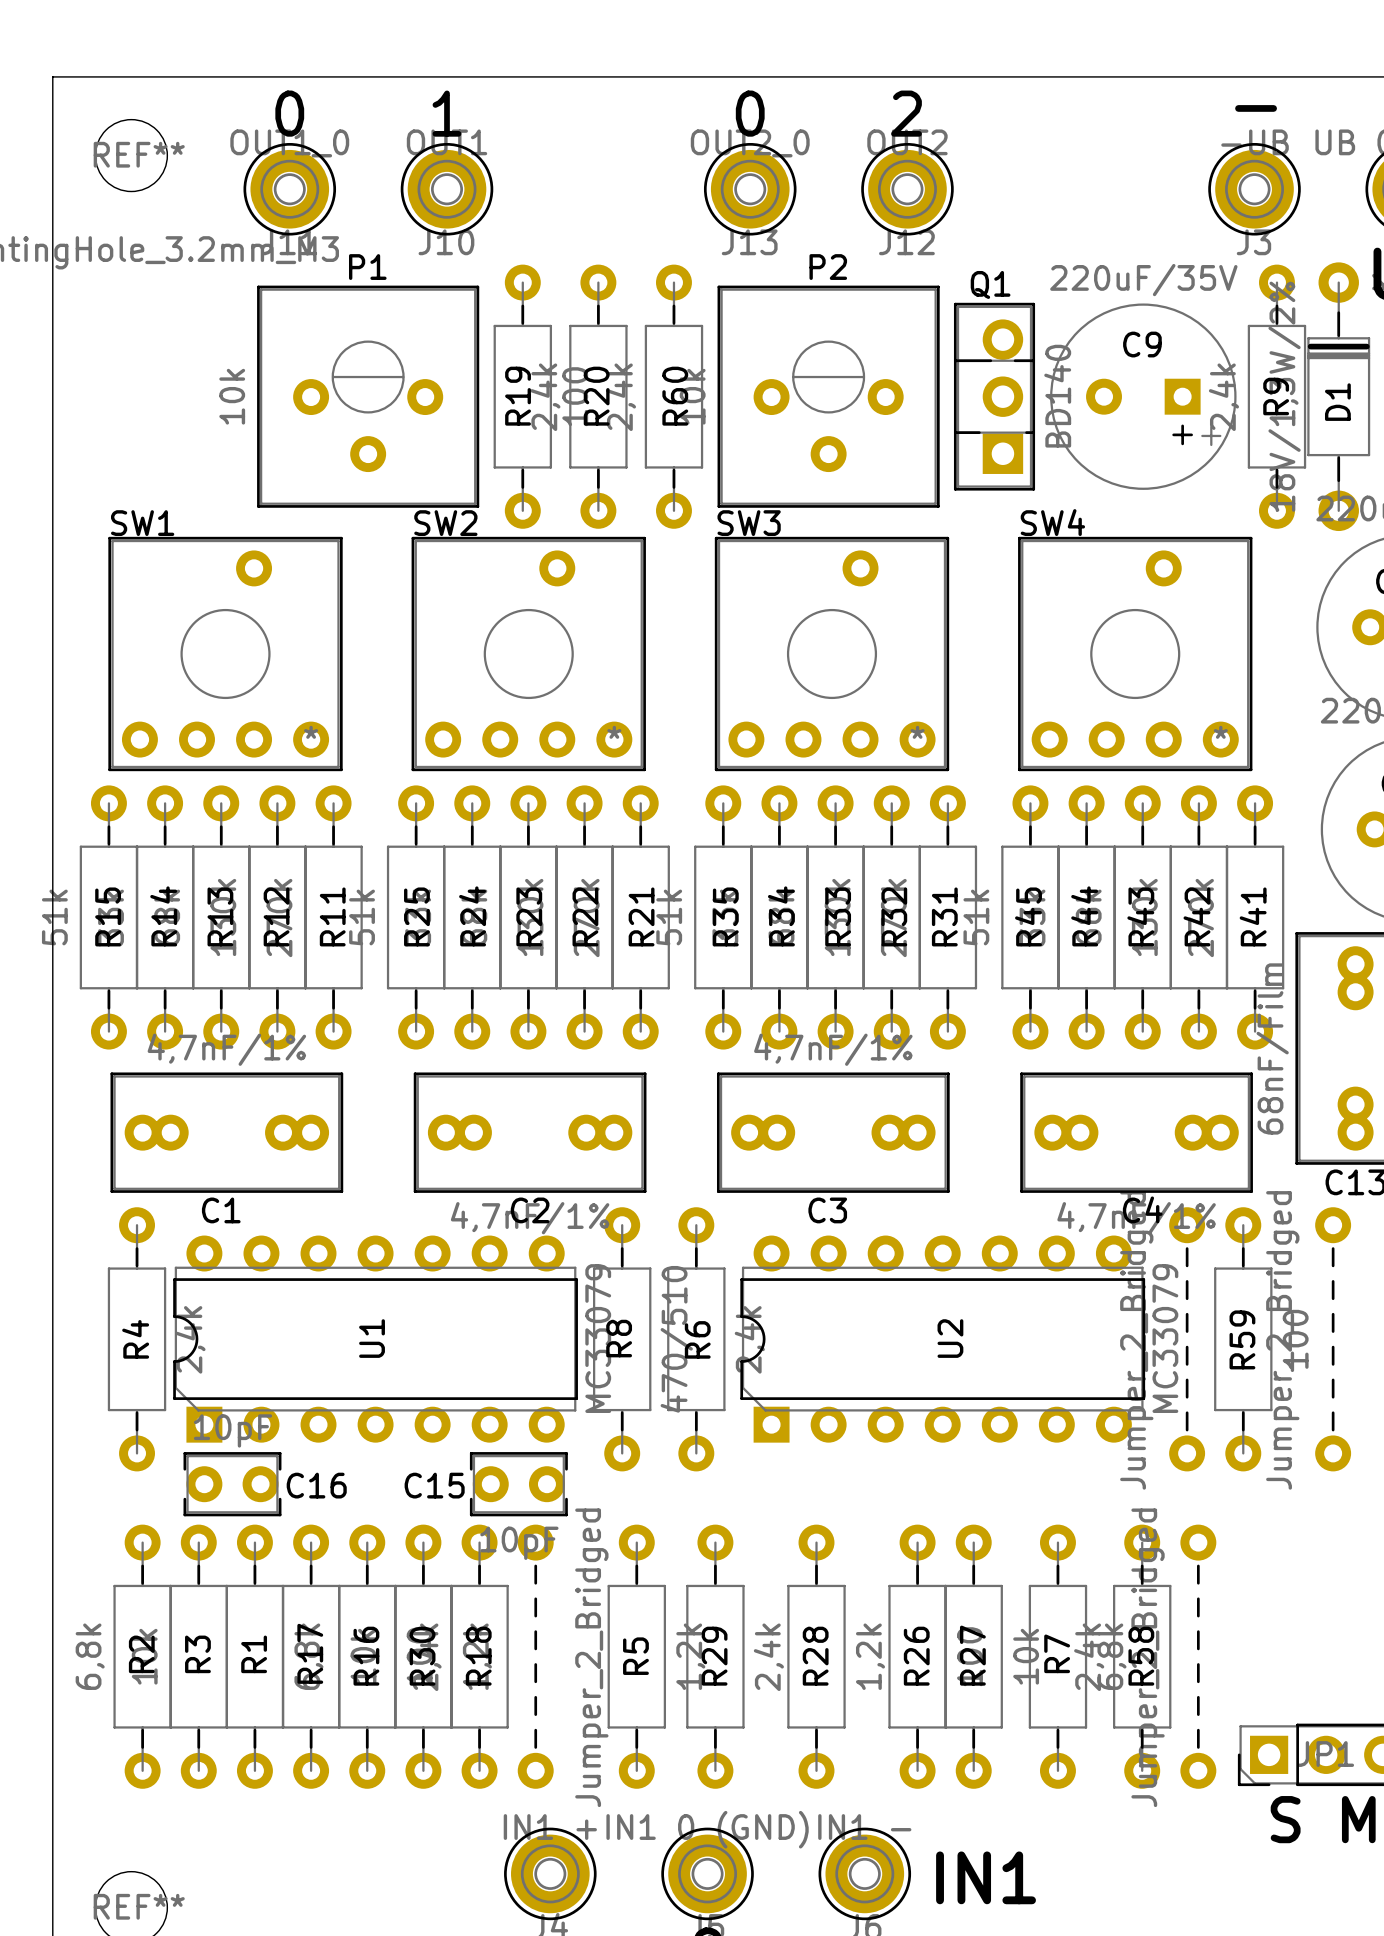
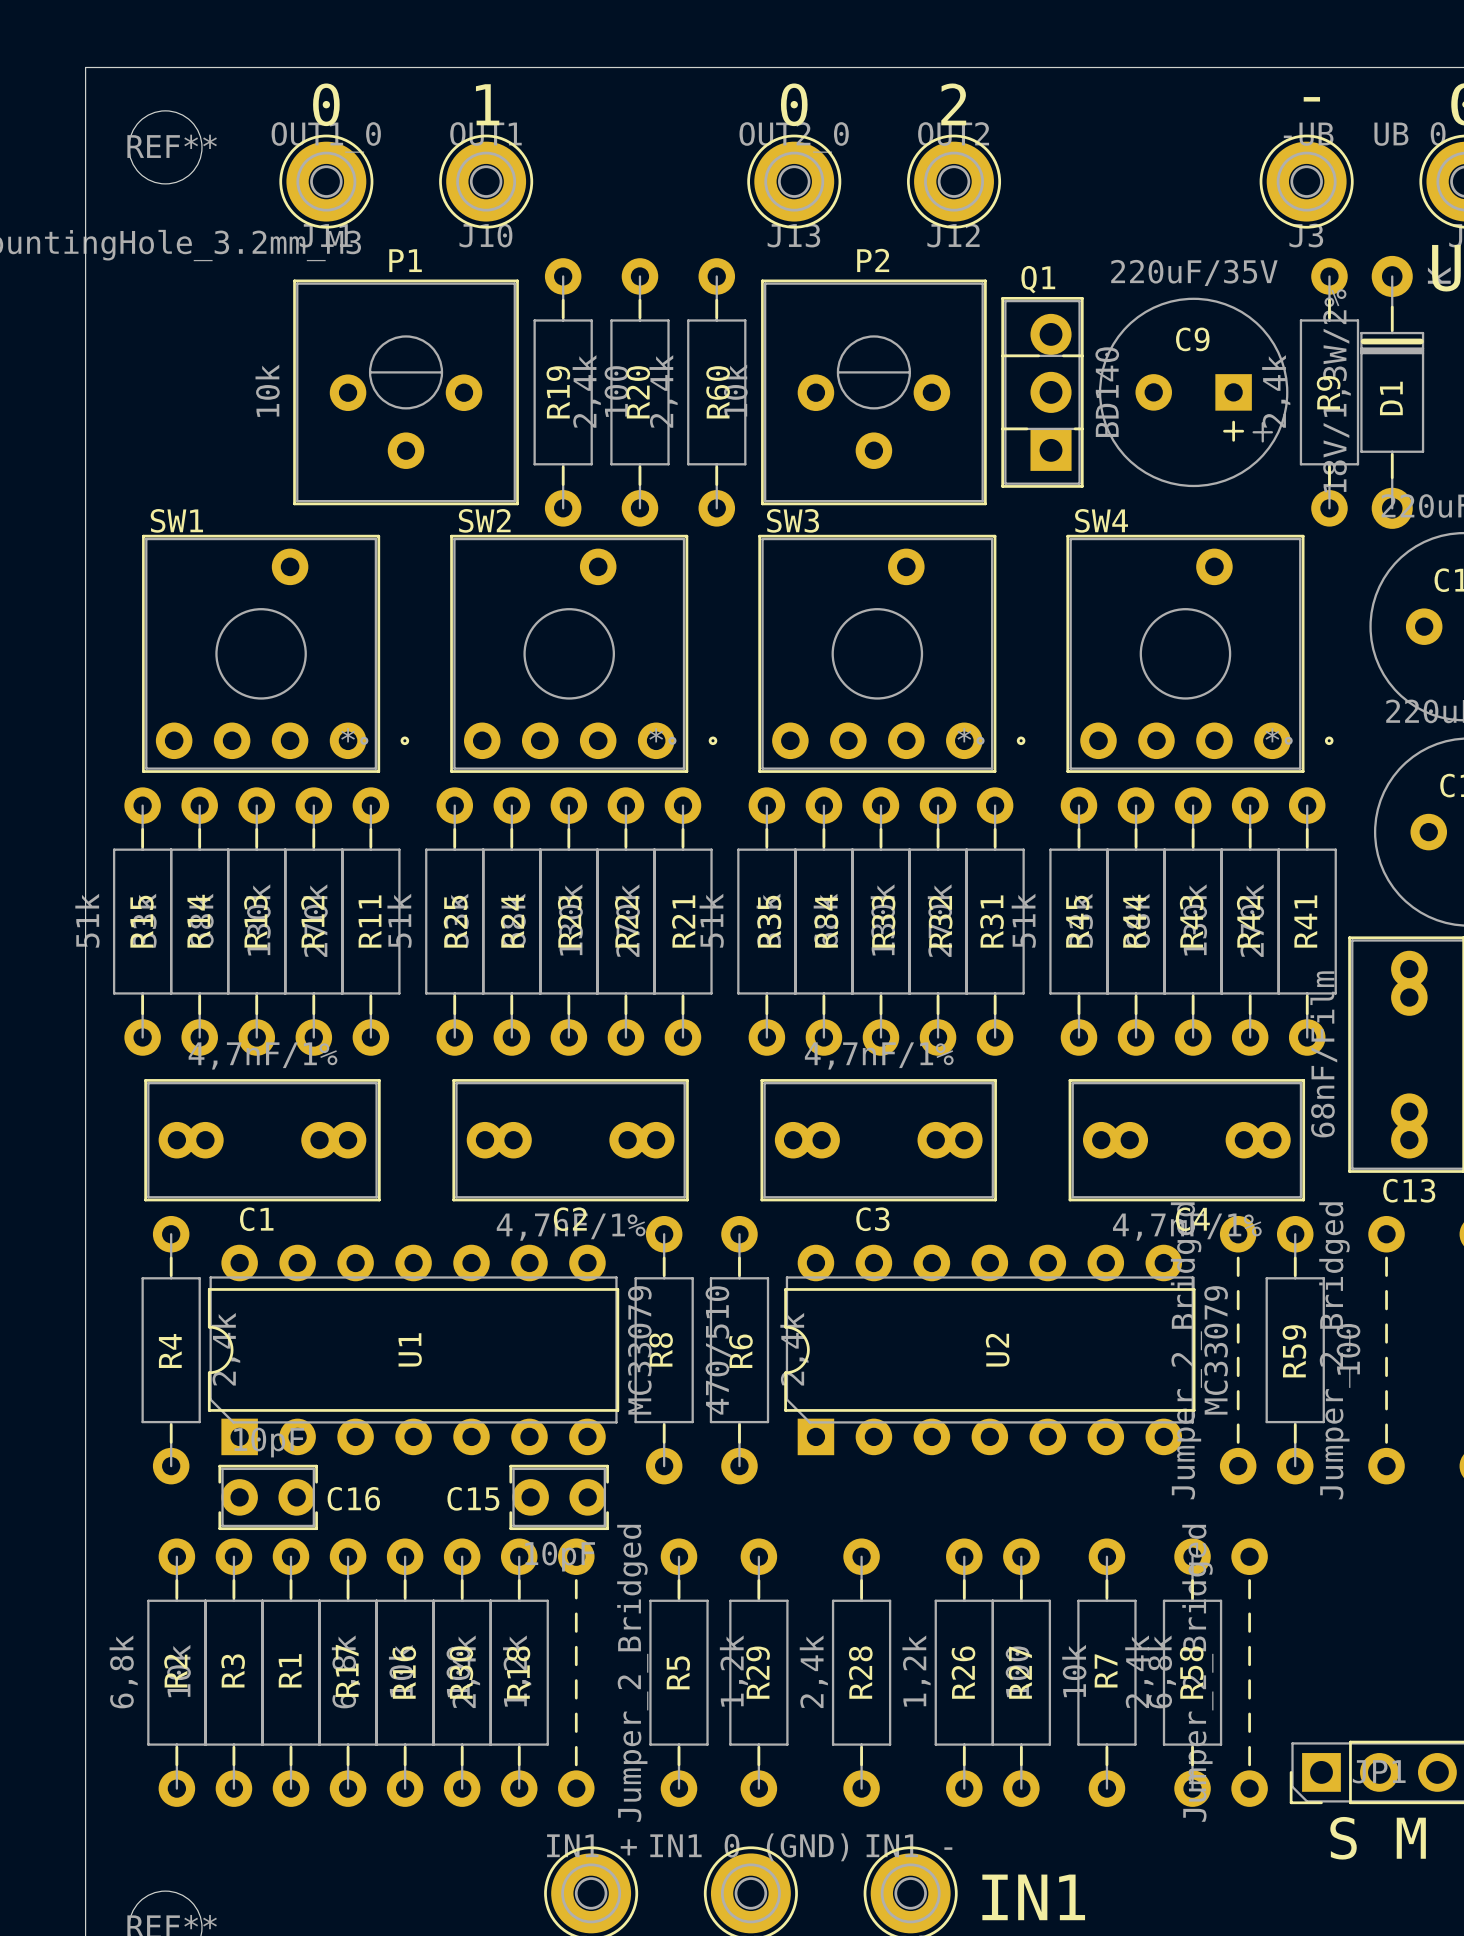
SW1 footprint: [108, 536, 343, 772] -> [142, 534, 410, 773]
SW2 footprint: [411, 536, 646, 772] -> [450, 534, 718, 773]
SW3 footprint: [714, 536, 950, 772] -> [758, 534, 1026, 773]
SW4 footprint: [1018, 536, 1253, 772] -> [1066, 534, 1334, 773]

